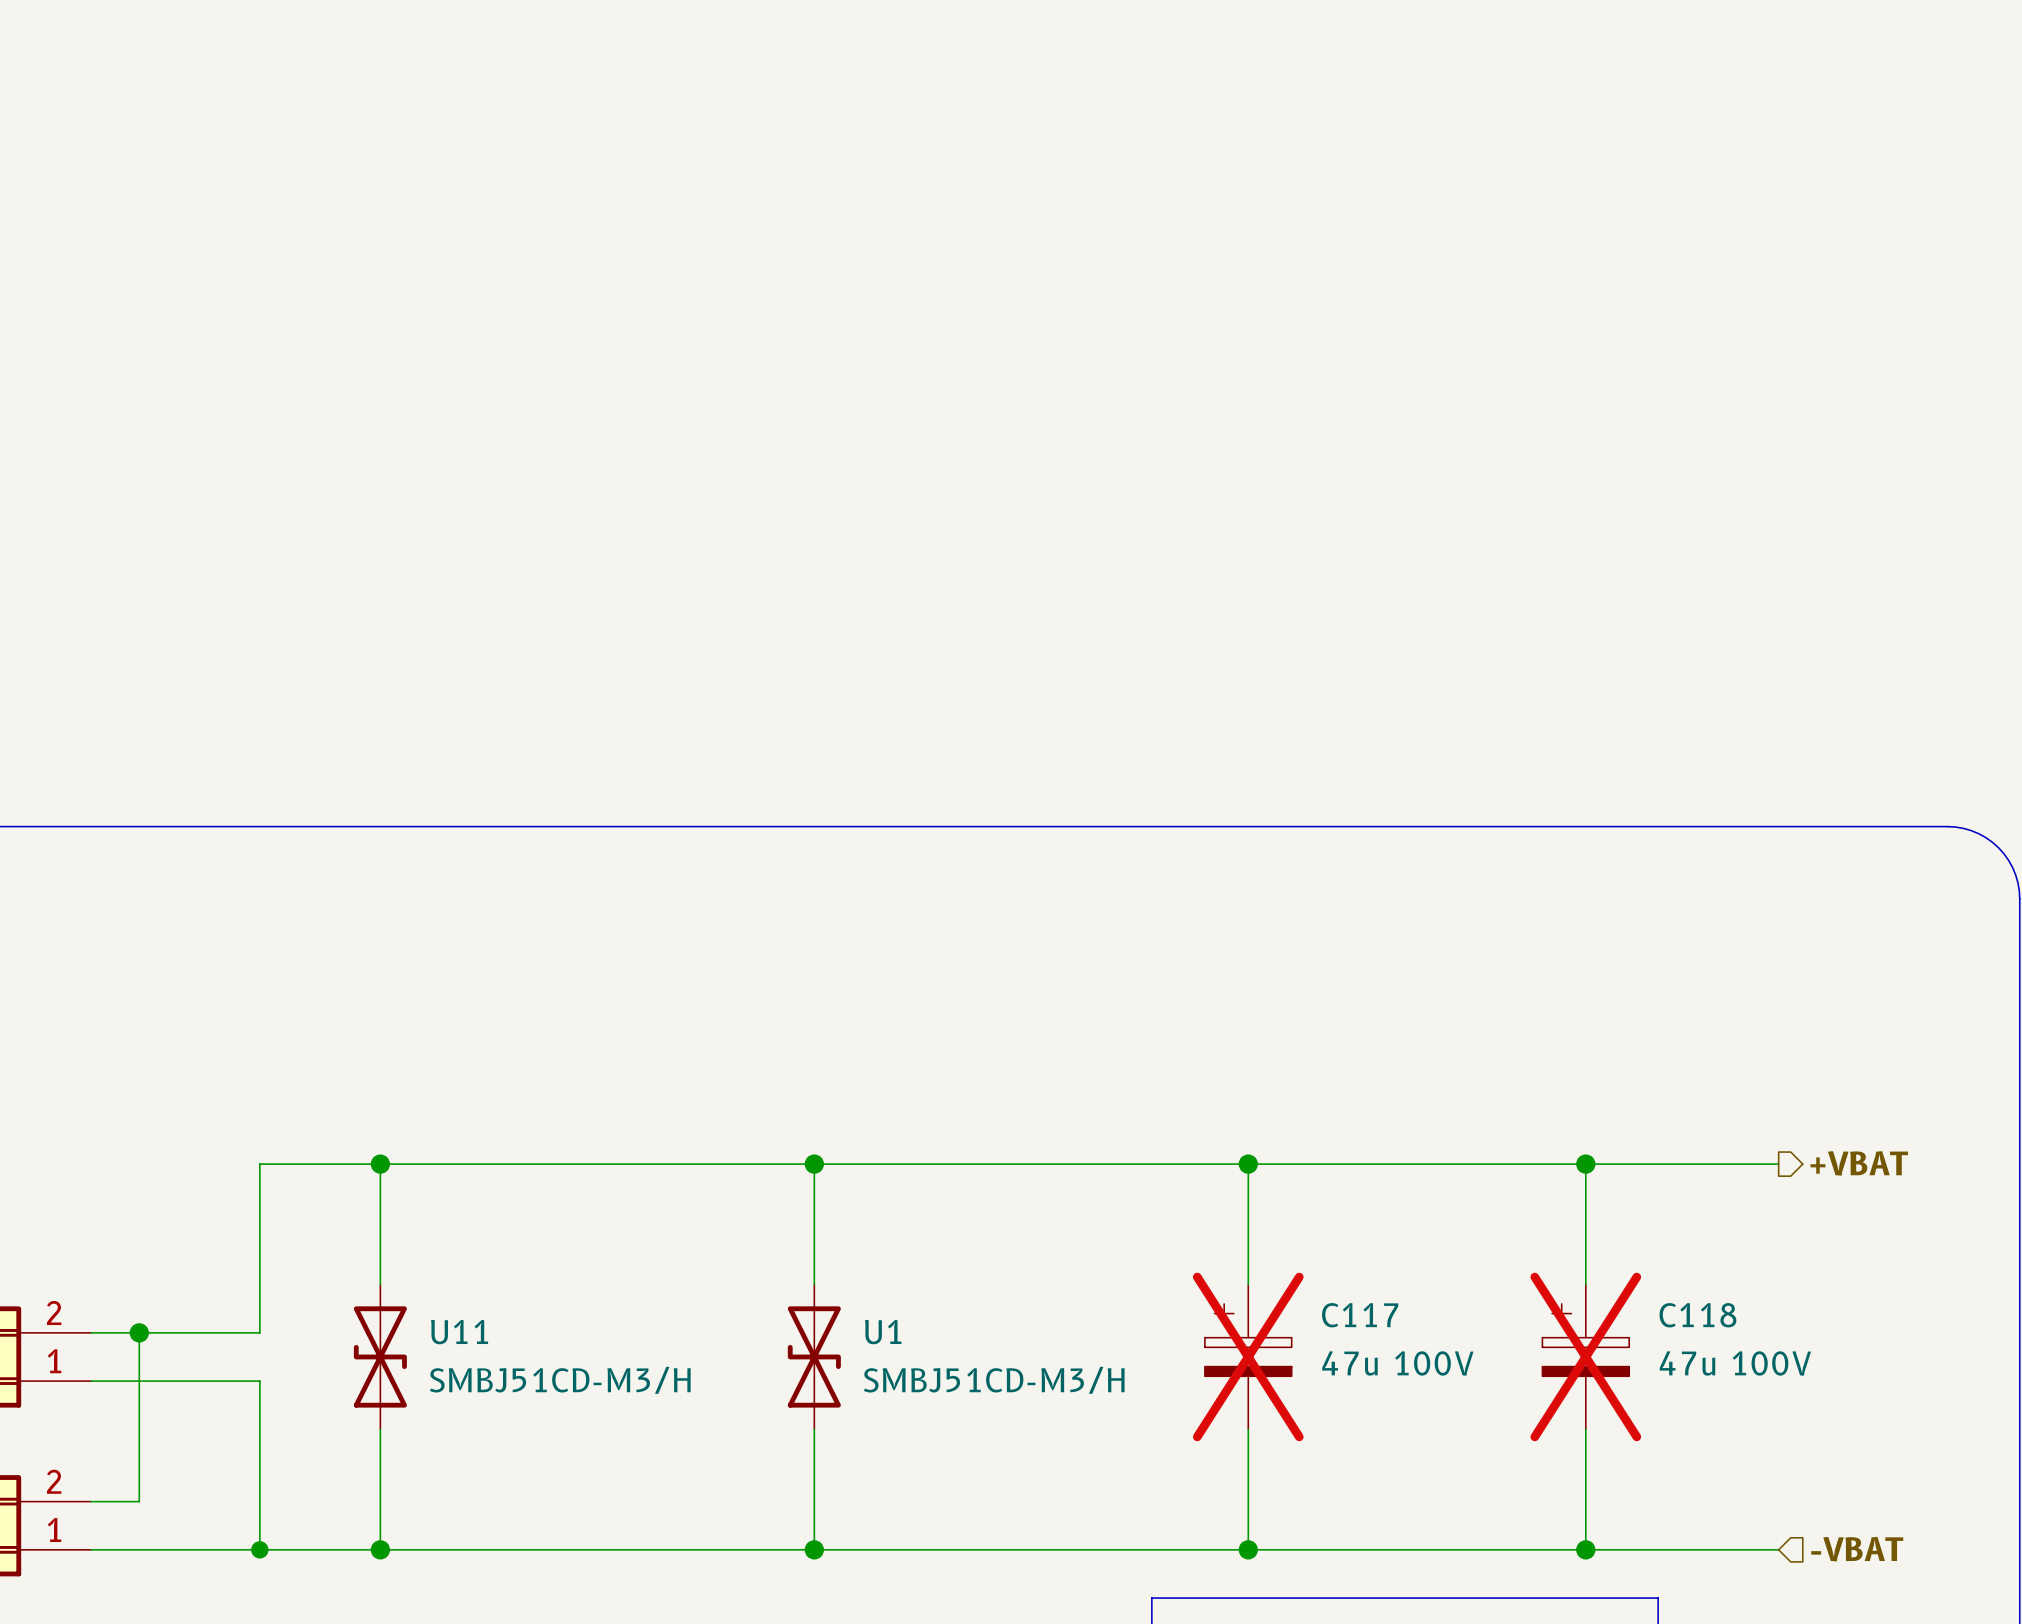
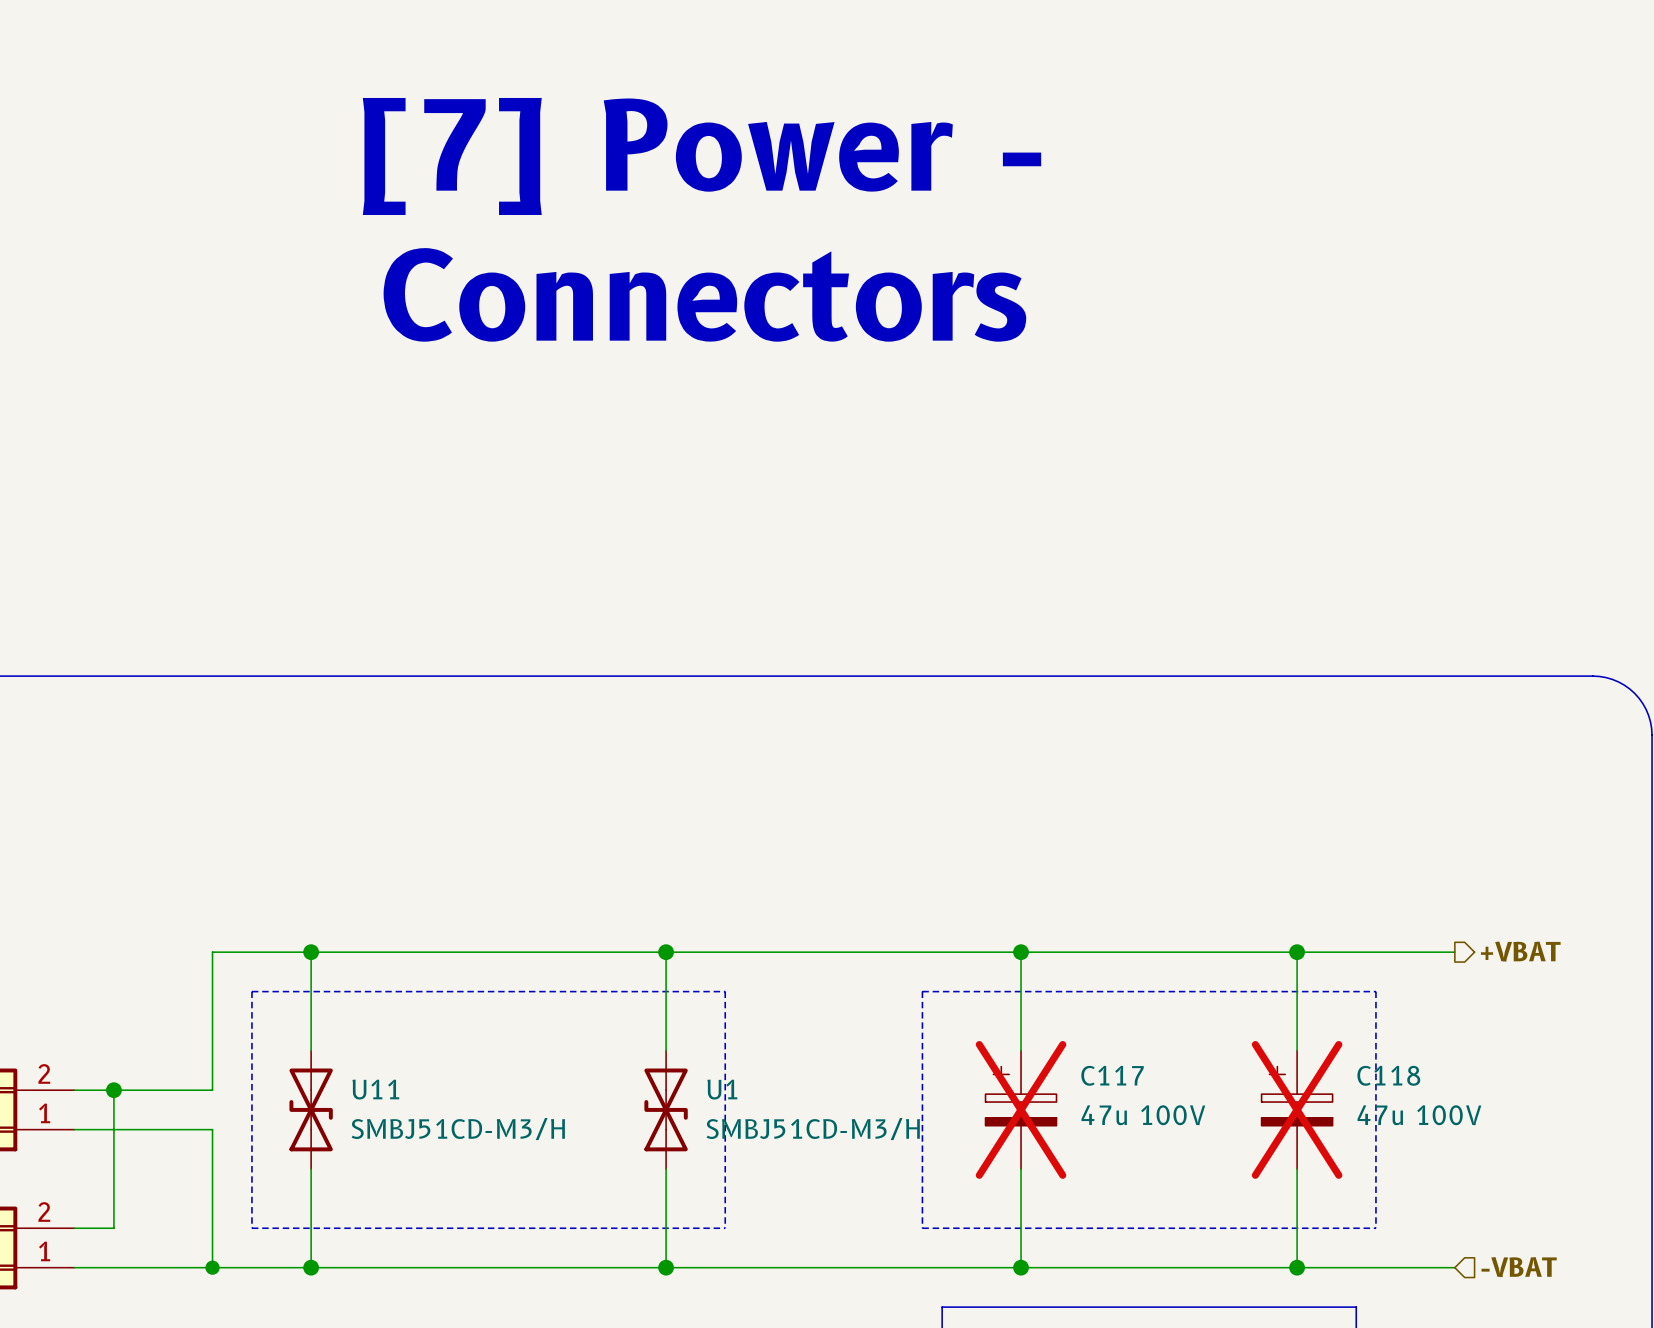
text: none -> [7] Power - (702, 156)
text: none -> Connectors (704, 294)
line: none -> (251, 991) (725, 991) (725, 1228) (251, 1228) (251, 991)
line: none -> (922, 991) (1375, 991) (1375, 1228) (922, 1228) (922, 991)

